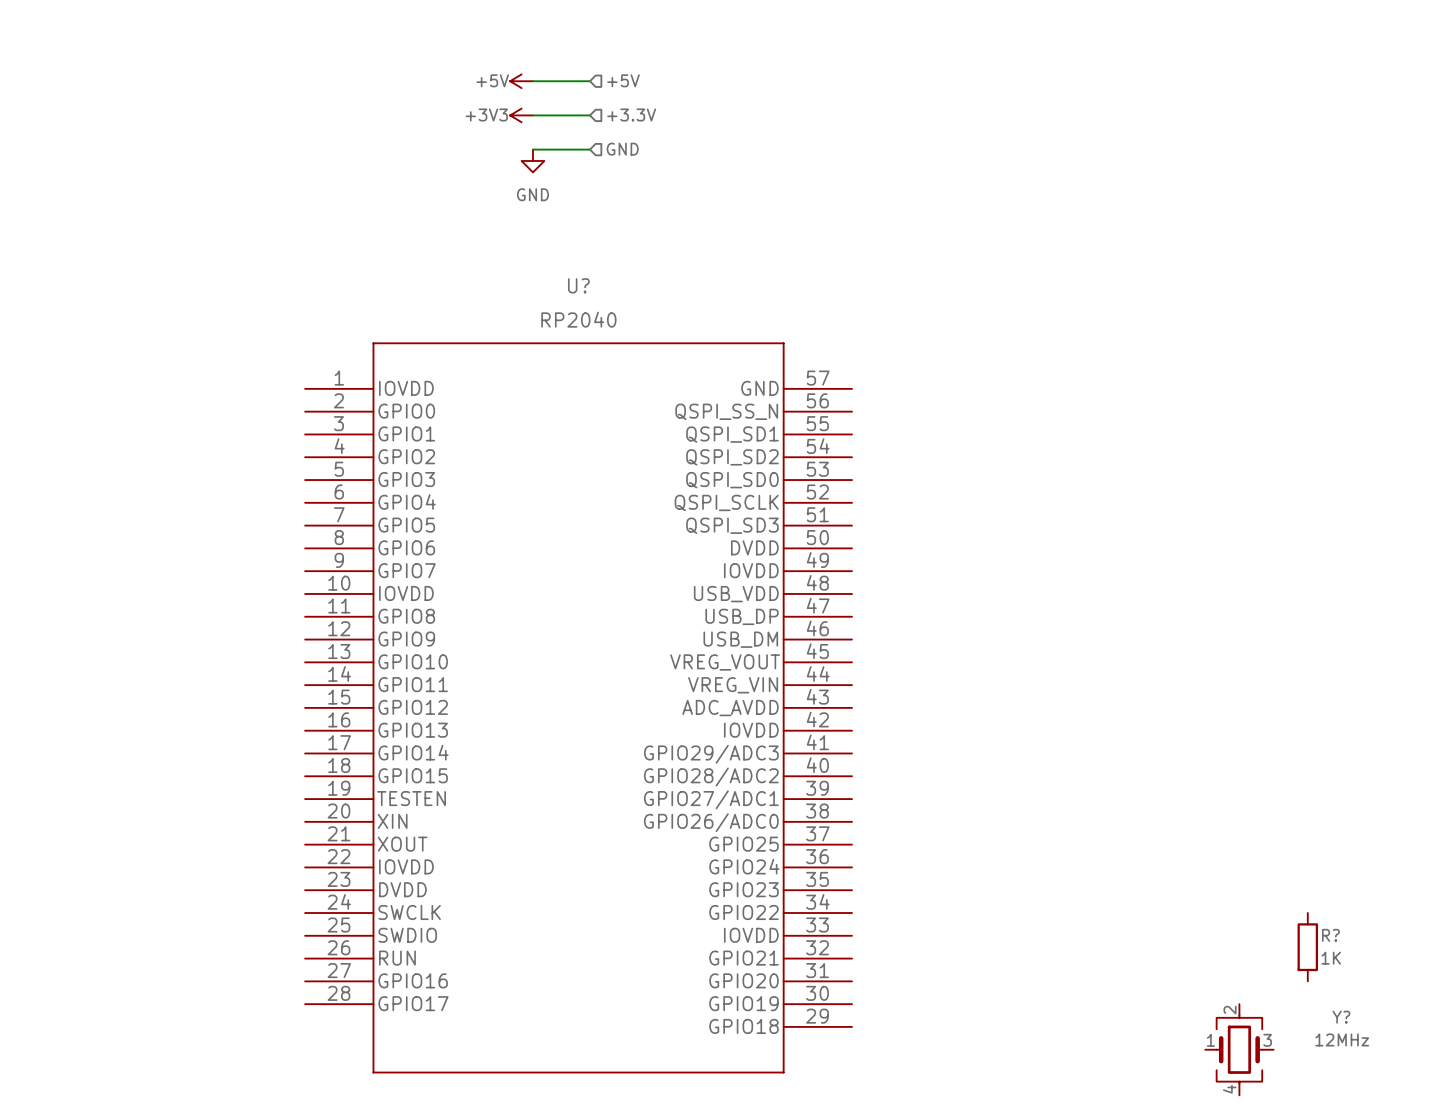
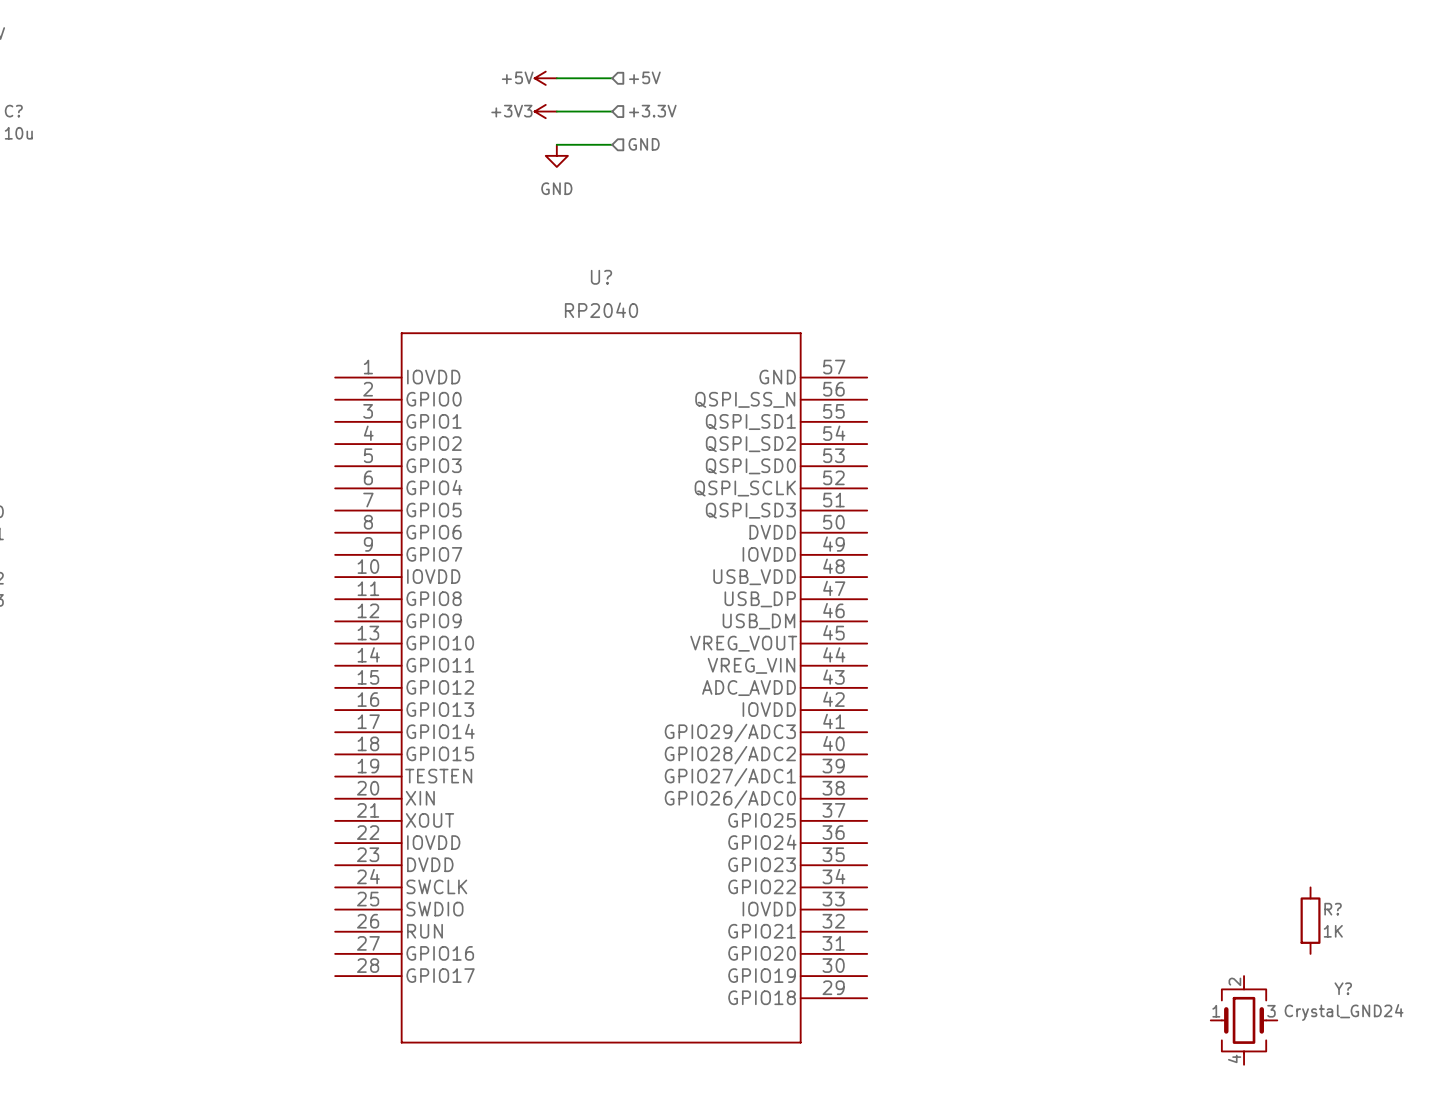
Y? value: 12MHz (1342, 1039) -> Crystal_GND24 (1344, 1012)

